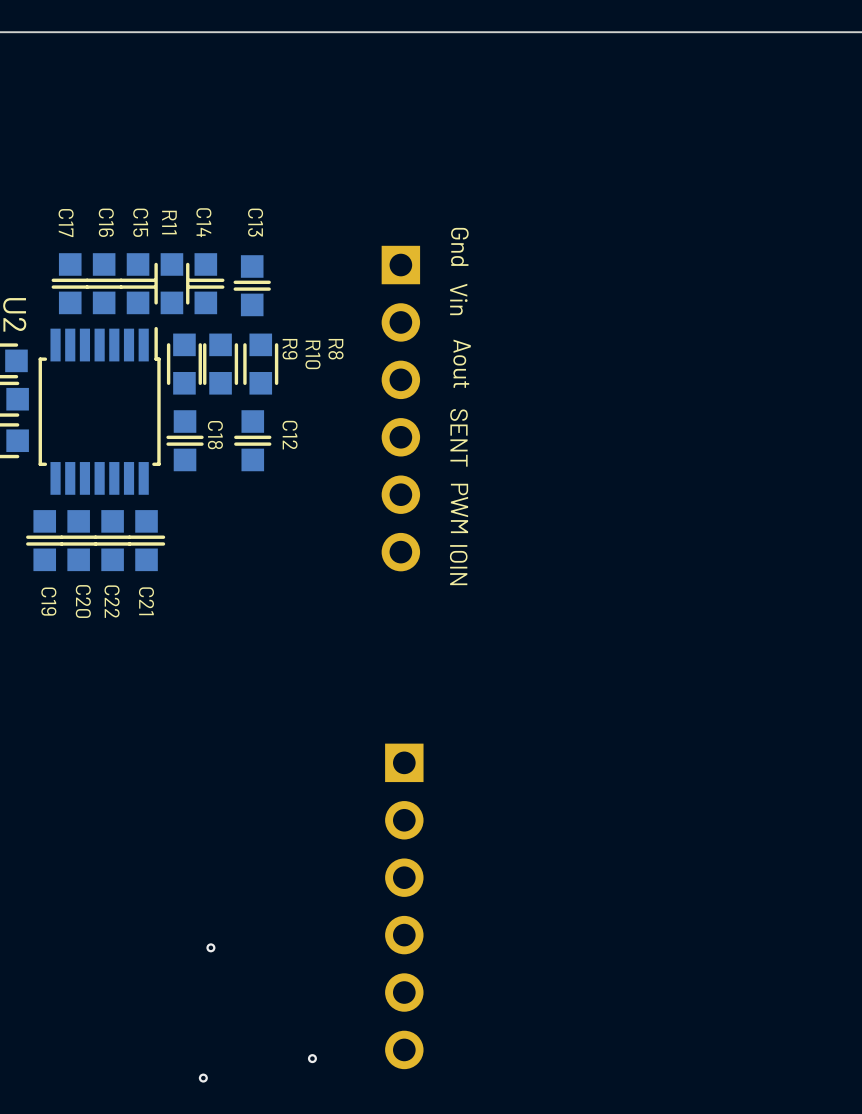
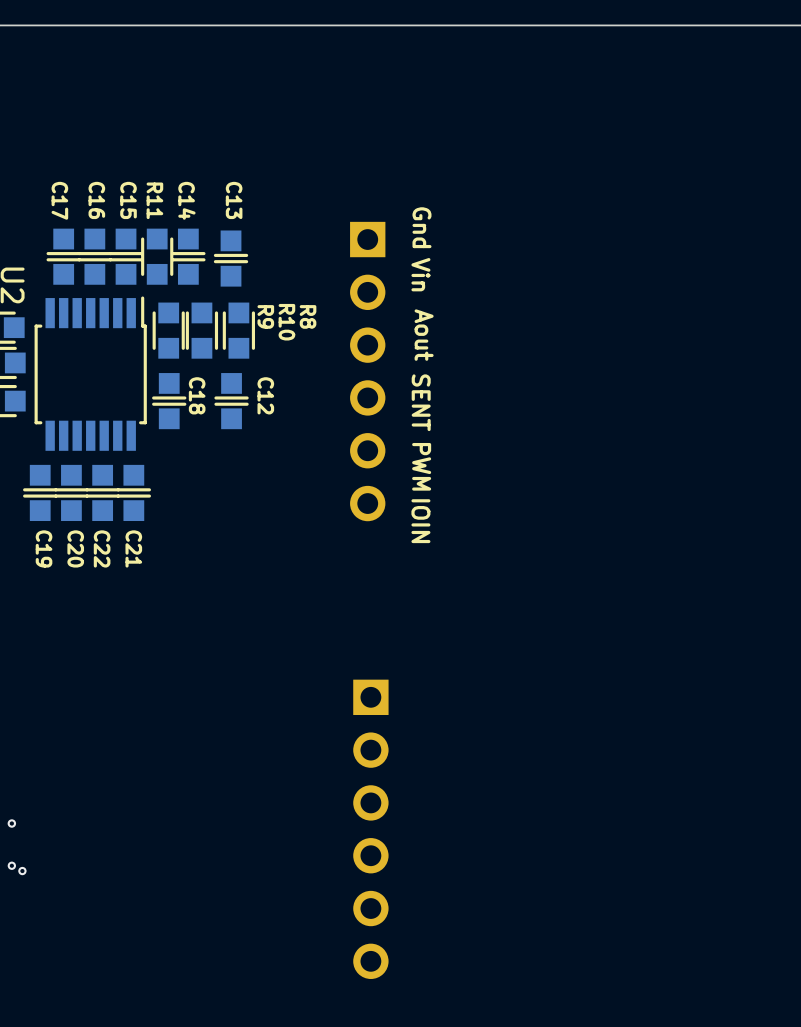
via: none -> (11, 823)
via: none -> (11, 865)
via: (210, 947) -> none
via: none -> (22, 871)
via: (312, 1058) -> none
via: (203, 1078) -> none

